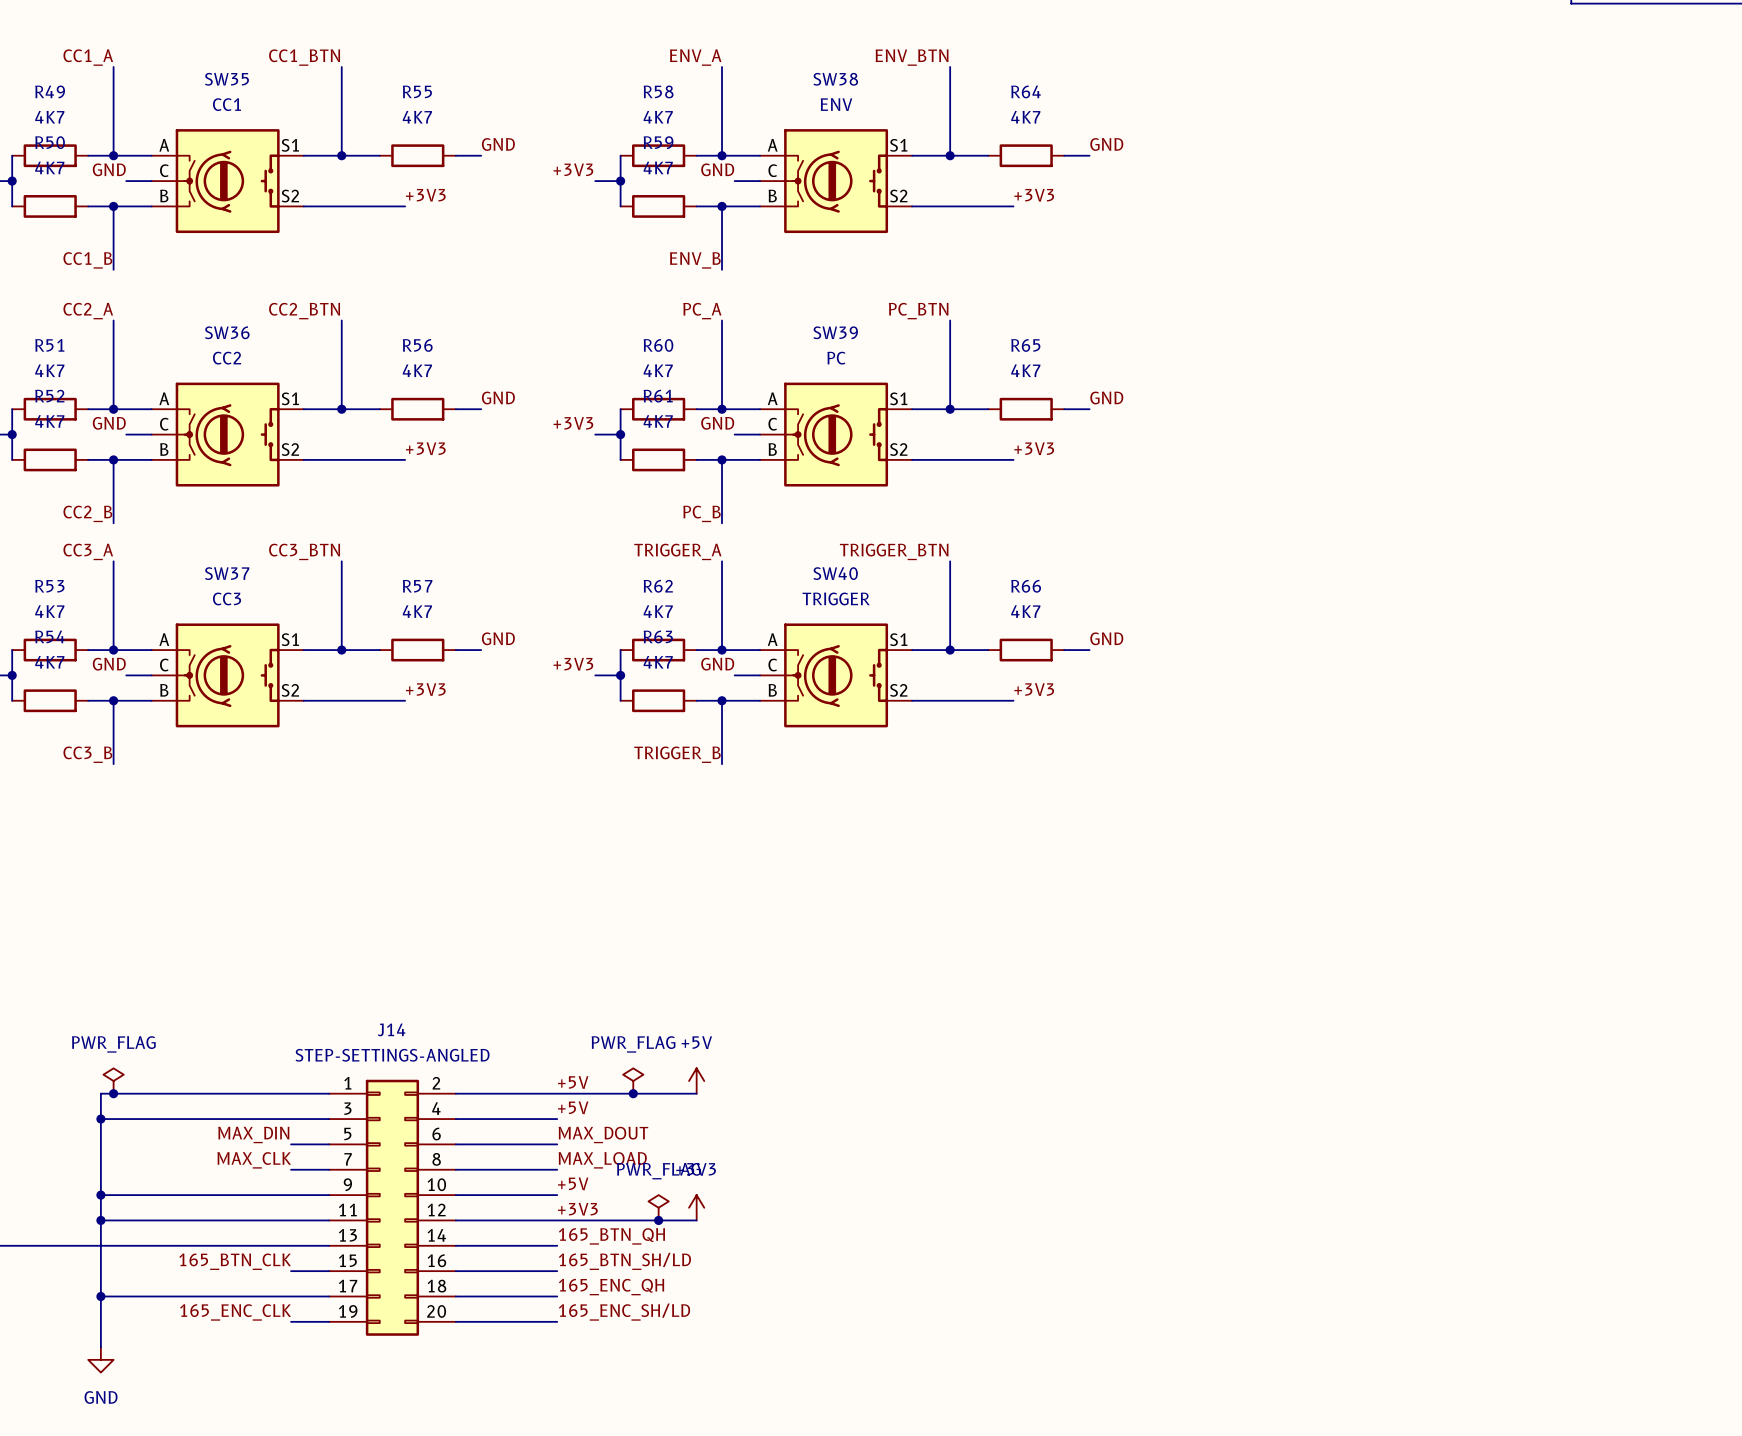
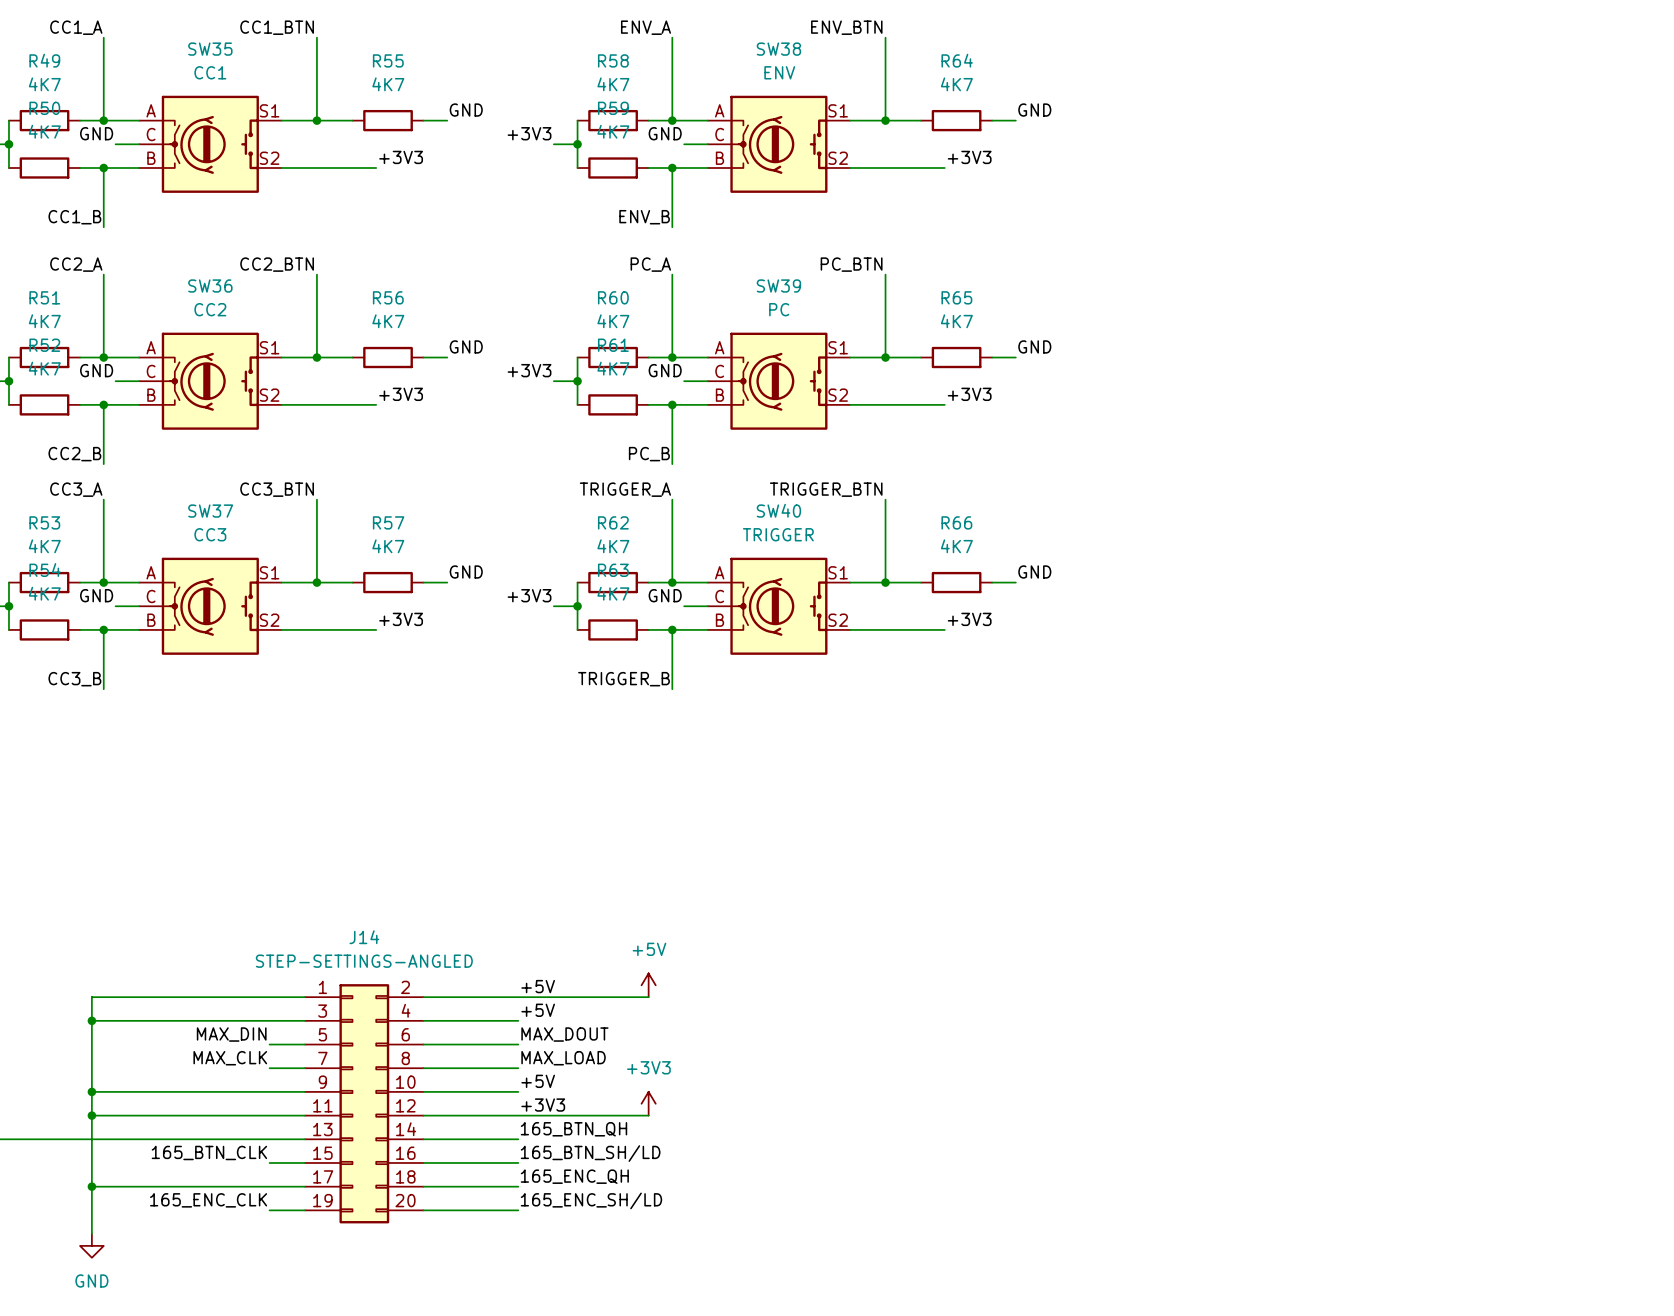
power symbol: PWR_FLAG (113, 1081) -> none
power symbol: PWR_FLAG (633, 1081) -> none
junction: (113, 1093) -> none
junction: (633, 1093) -> none
power symbol: PWR_FLAG (658, 1207) -> none
junction: (658, 1220) -> none

